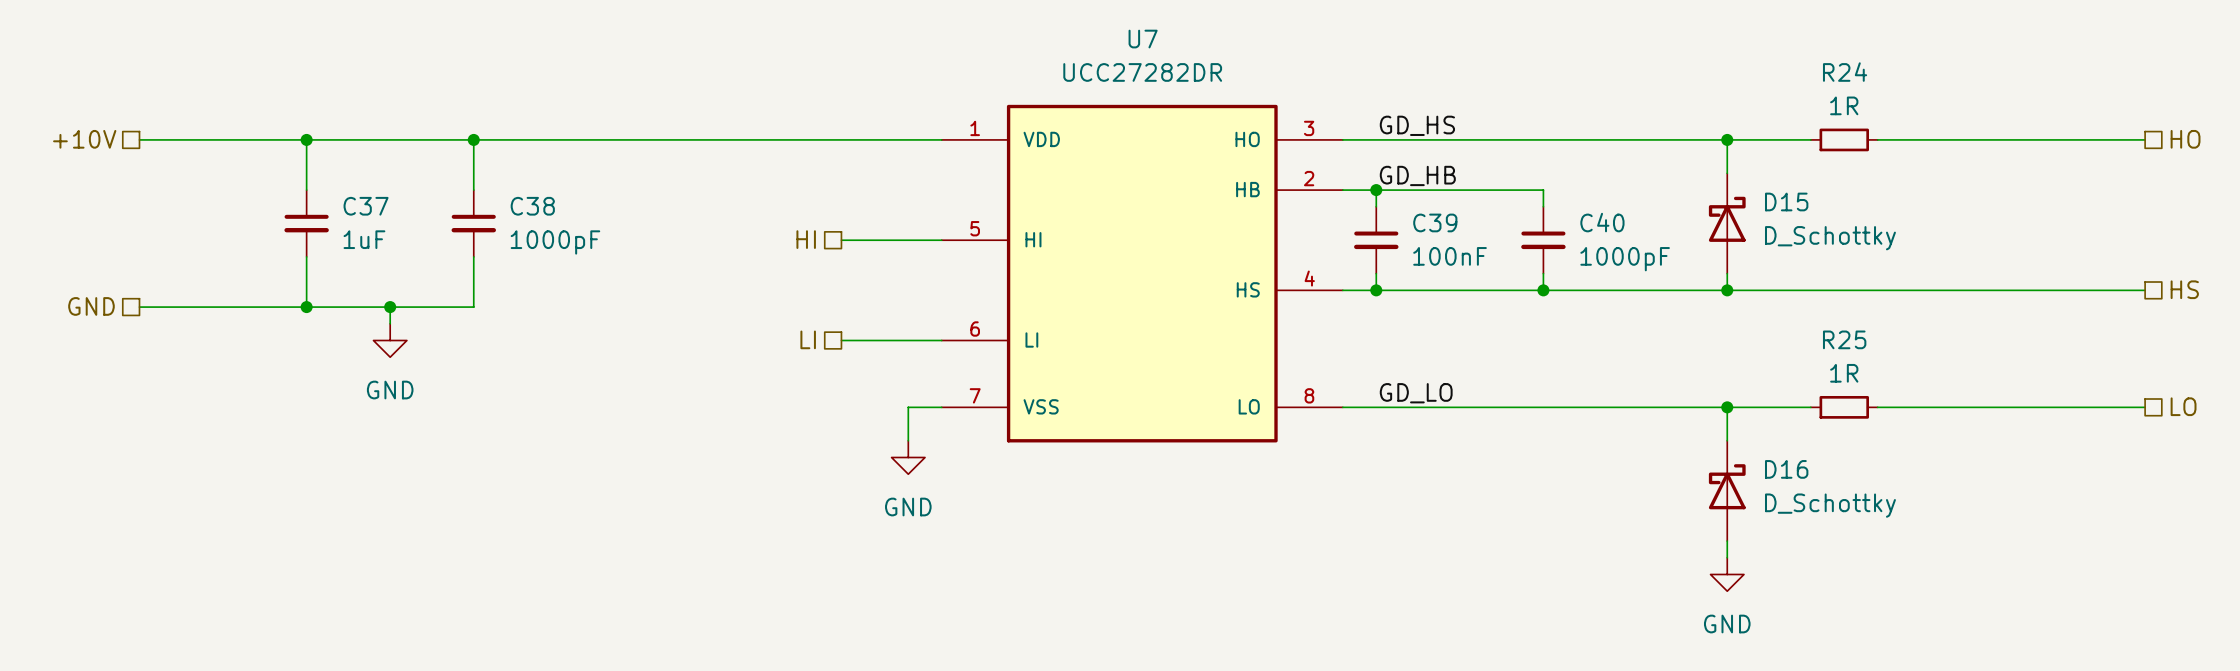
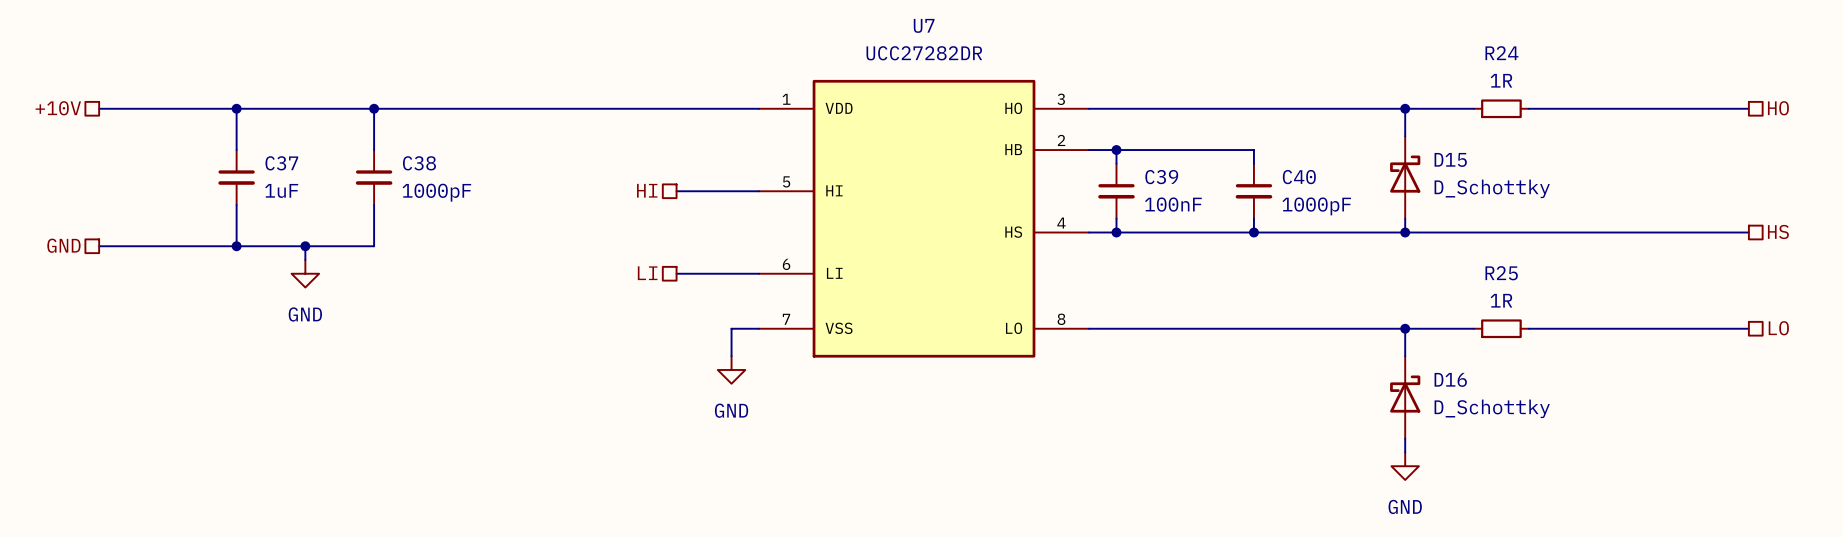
label: GD_HS (1417, 125) -> none
label: GD_HB (1417, 175) -> none
label: GD_LO (1416, 393) -> none

